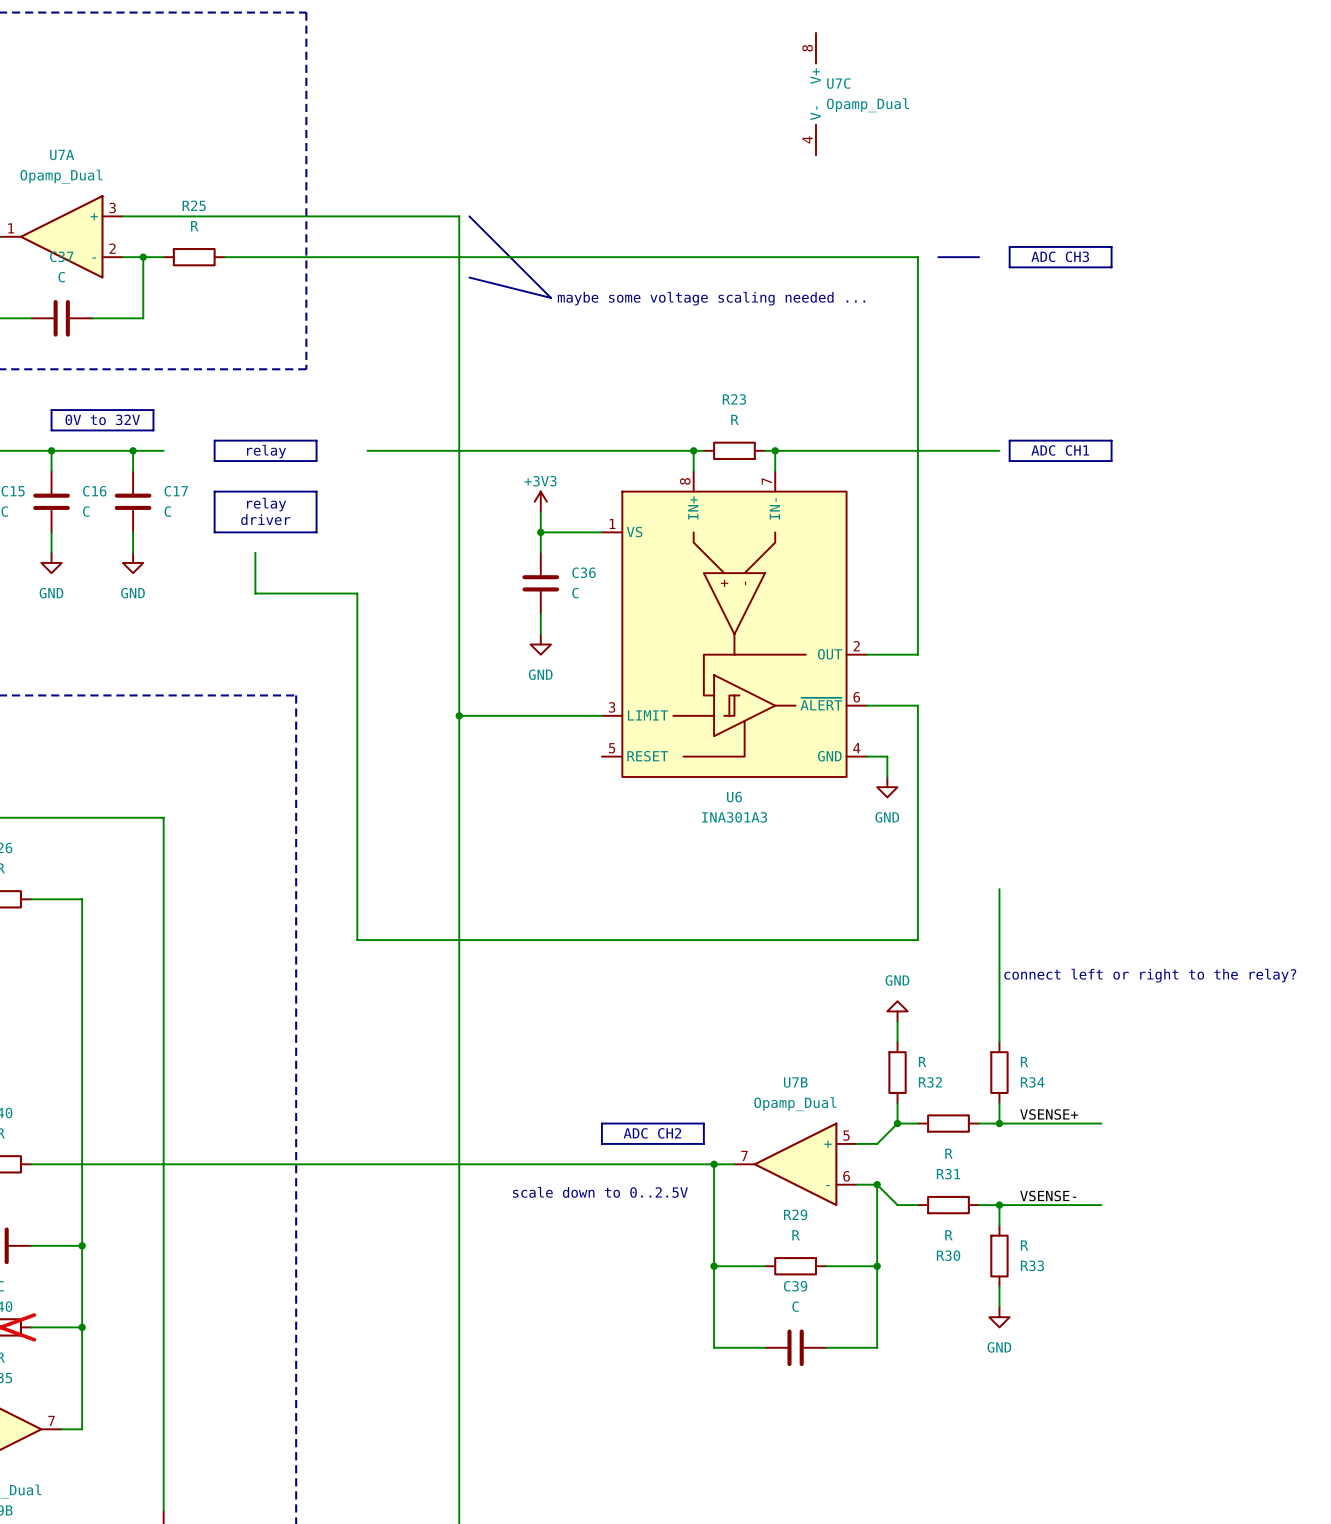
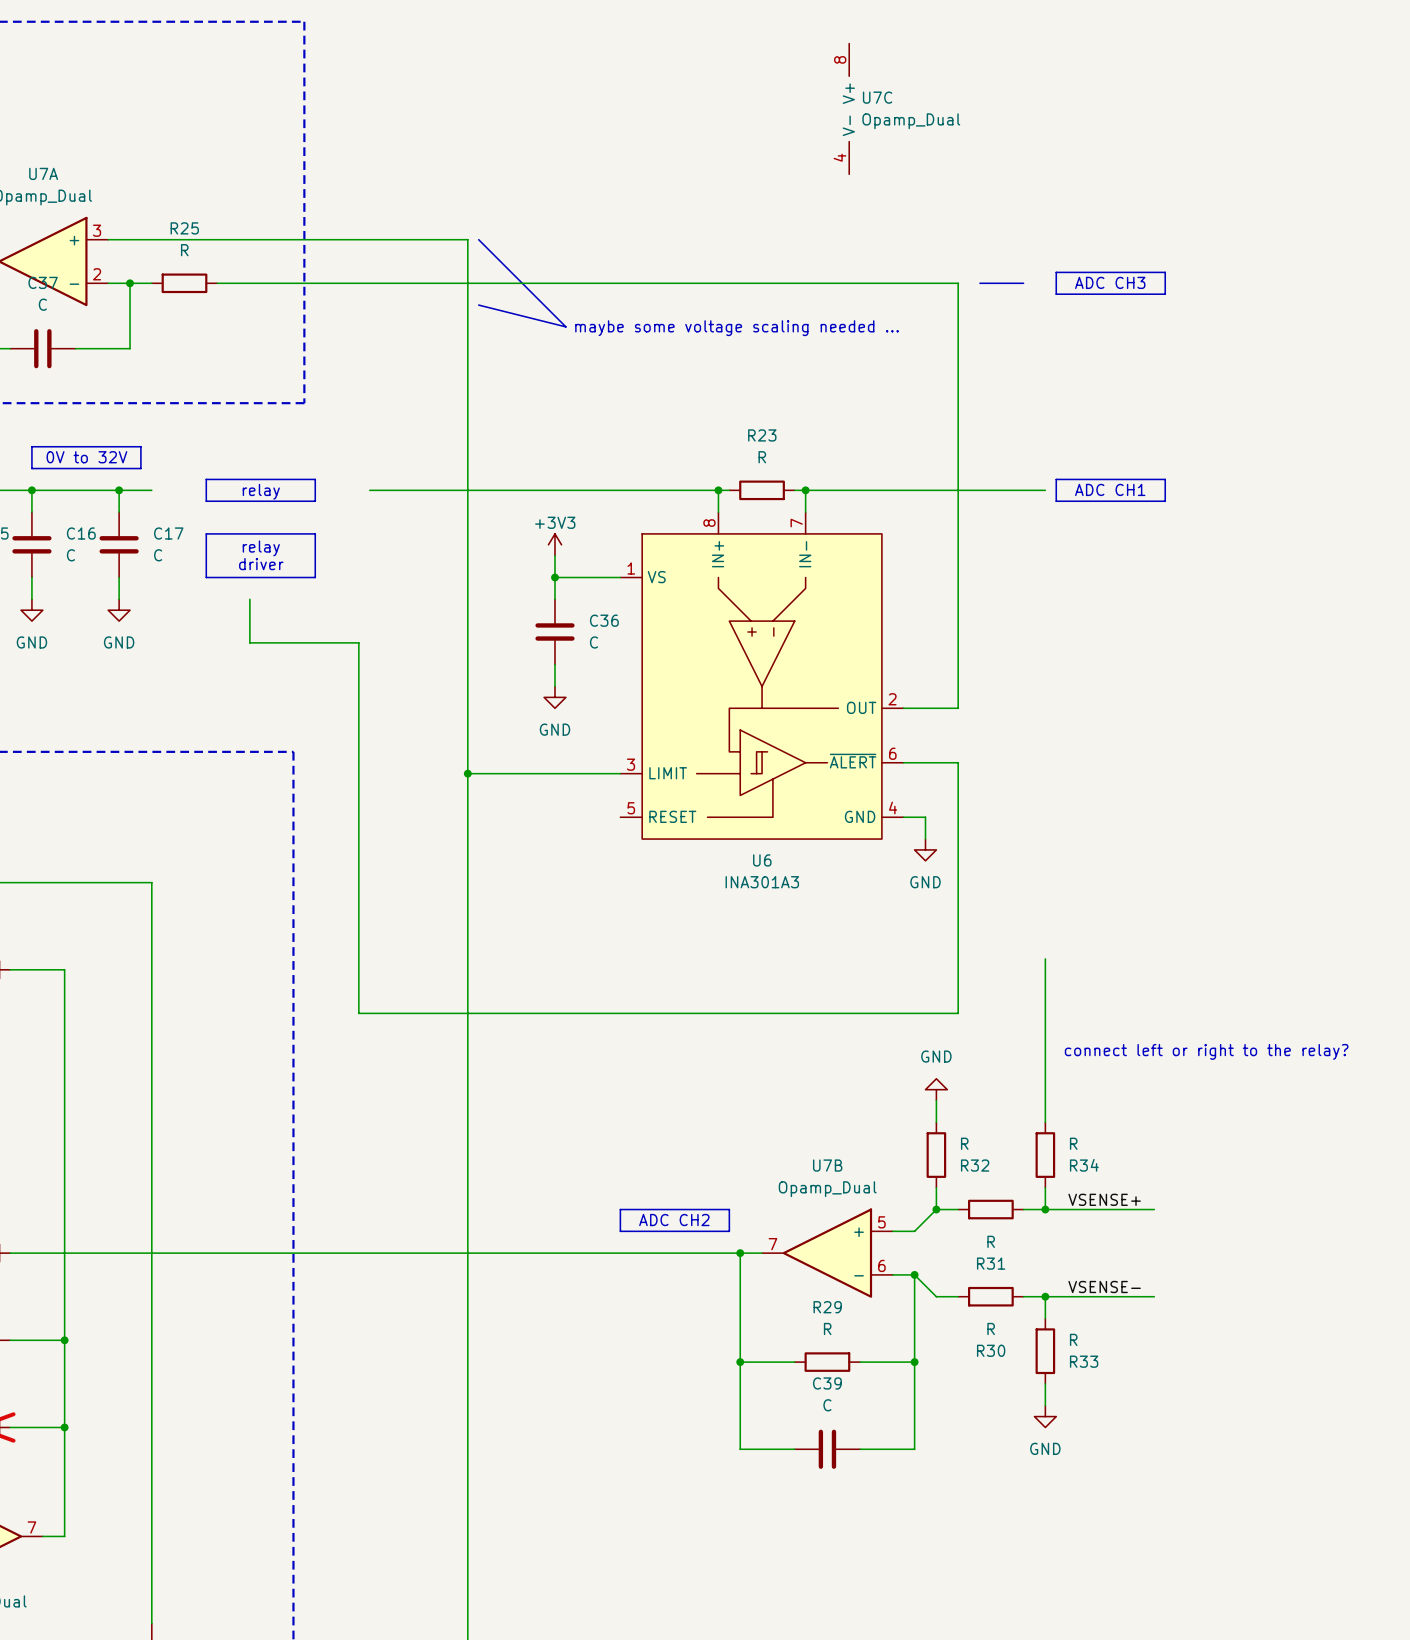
text: scale down to 0..2.5V (600, 1192) -> none

